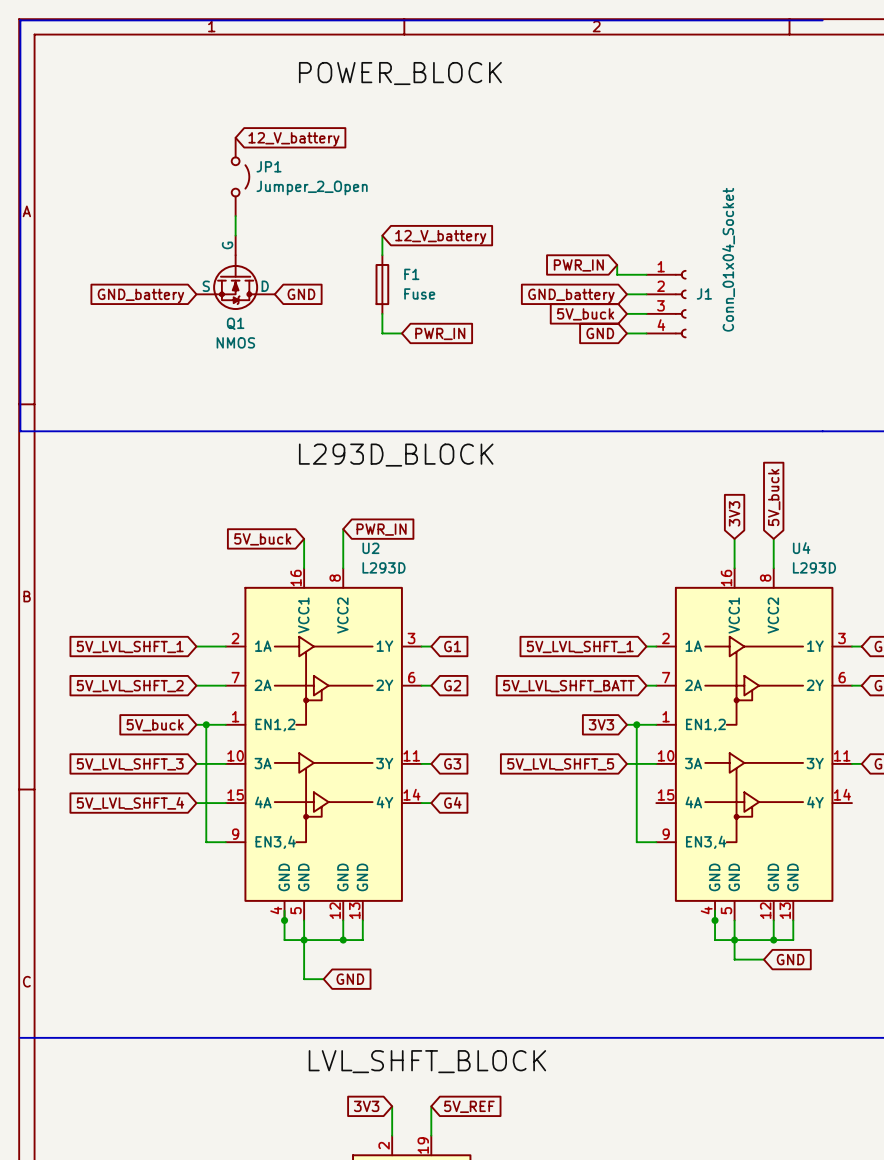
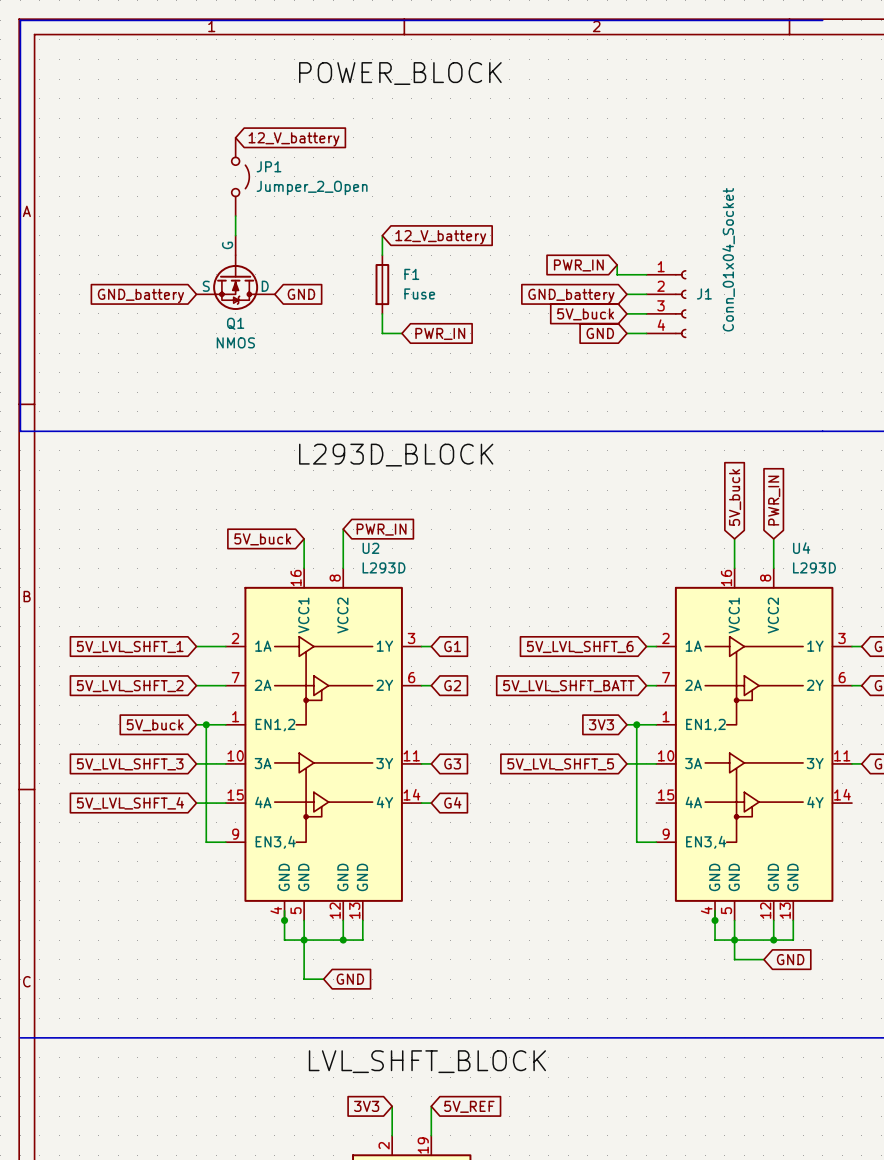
global label: 5V_buck (774, 497) -> PWR_IN (774, 500)
global label: 3V3 (734, 513) -> 5V_buck (735, 497)
global label: 5V_LVL_SHFT_1 (580, 647) -> 5V_LVL_SHFT_6 (580, 647)

